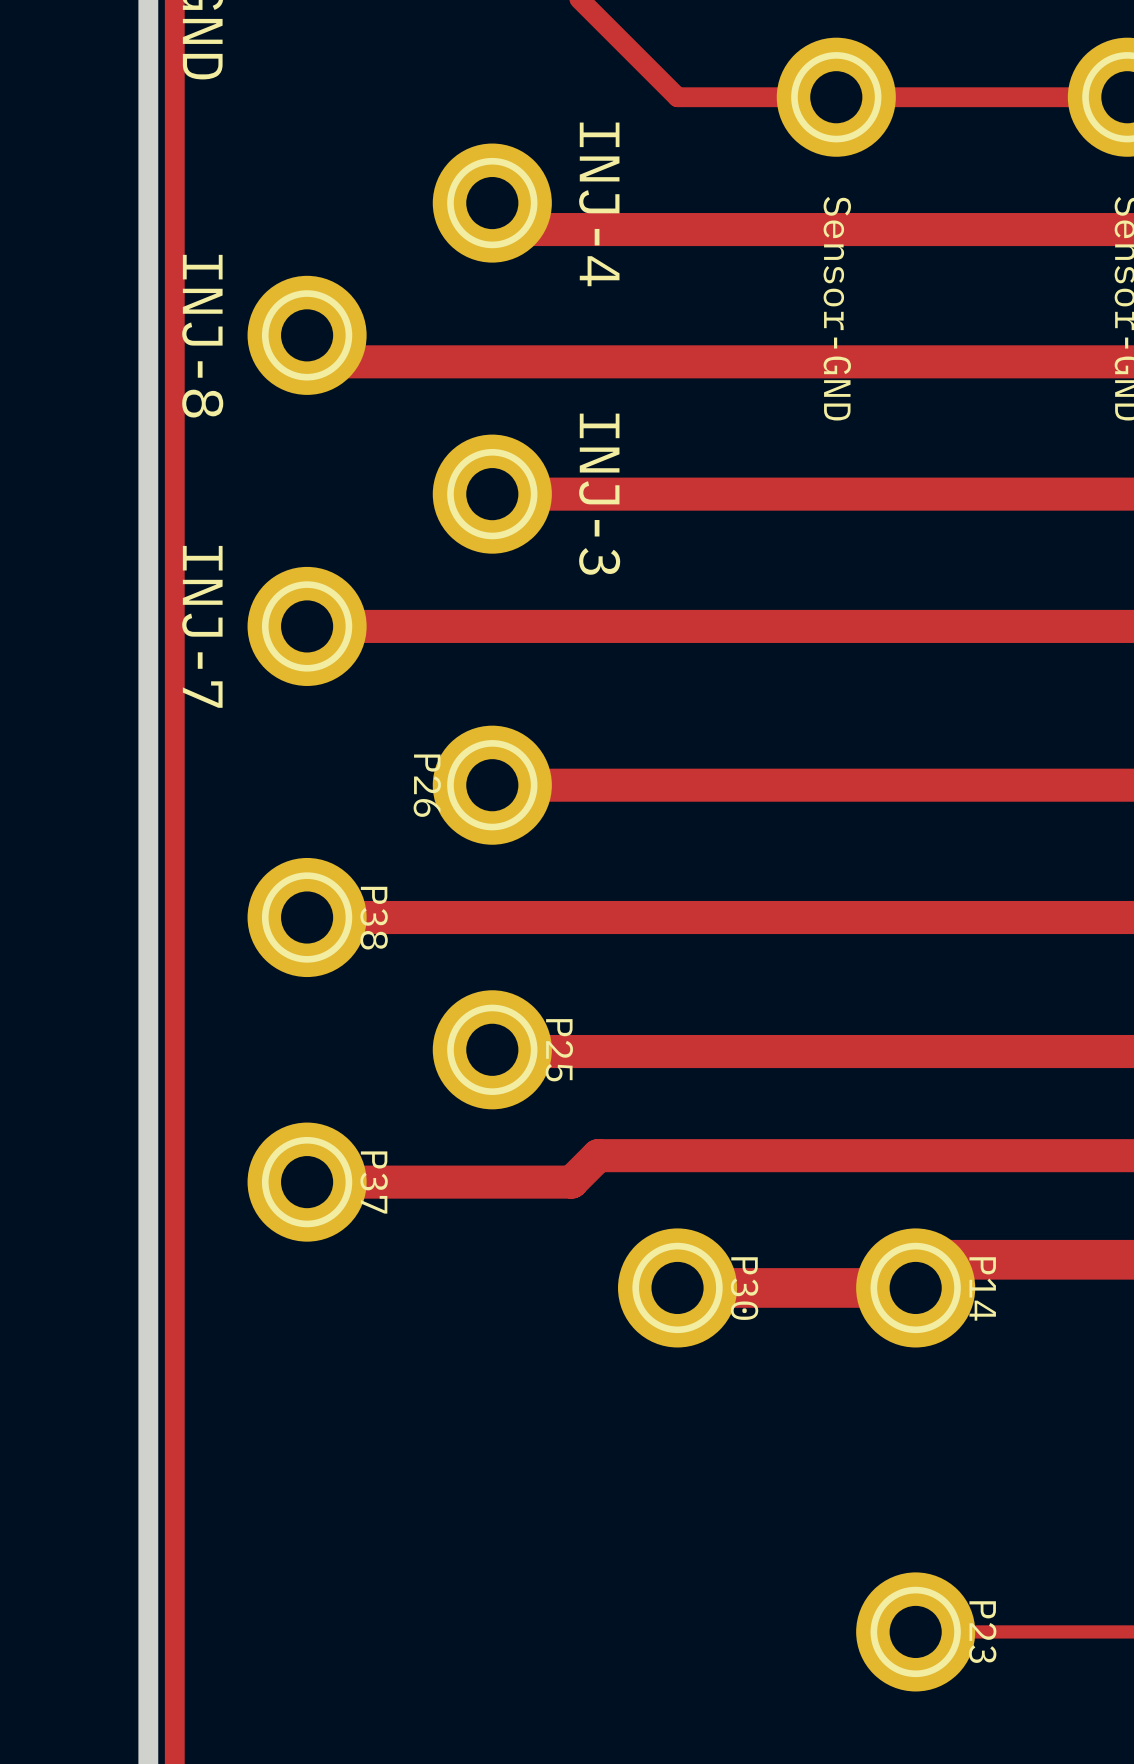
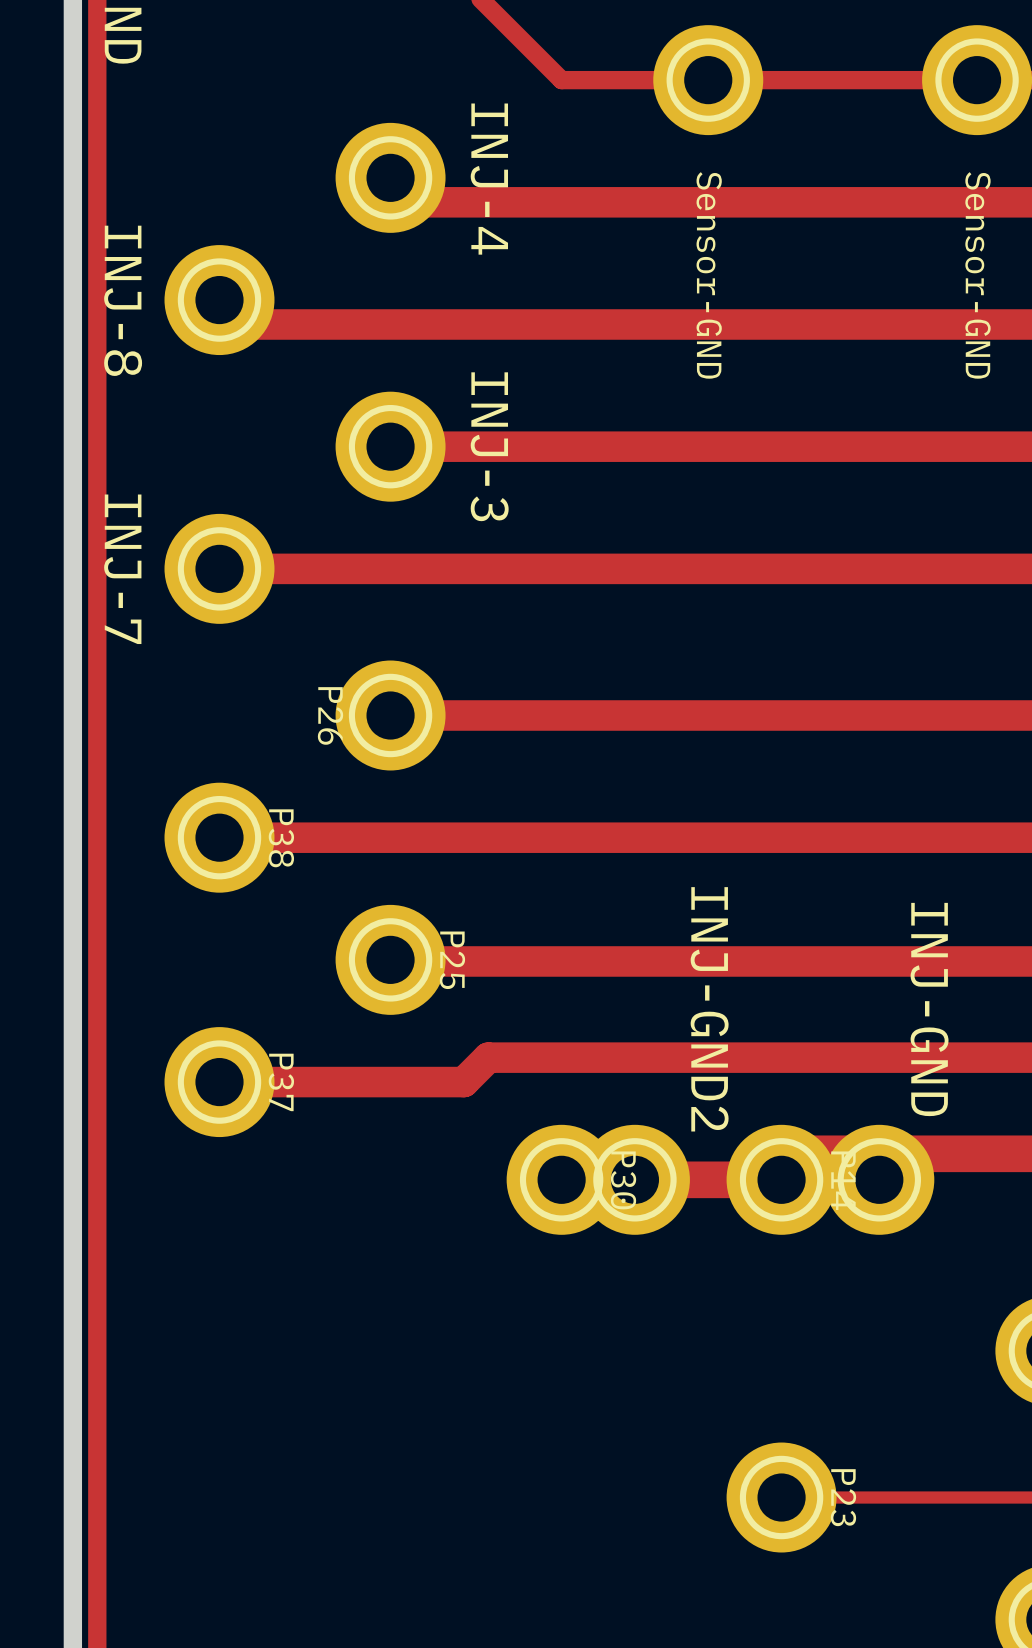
part: none -> INJ-GND2 (634, 1179)
part: none -> INJ-GND (879, 1179)

